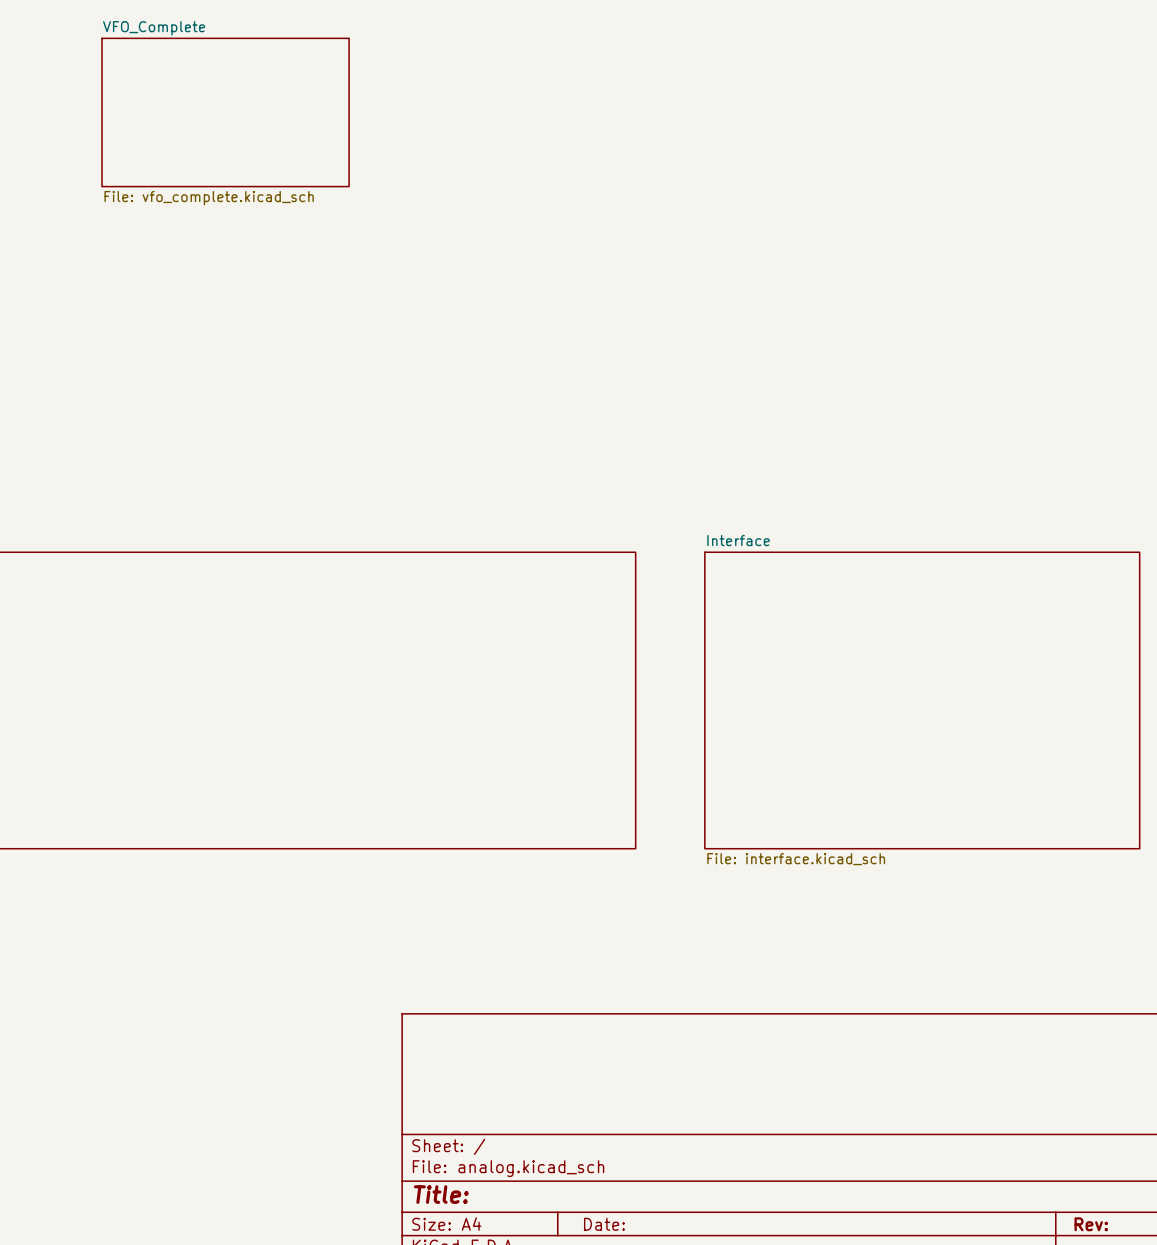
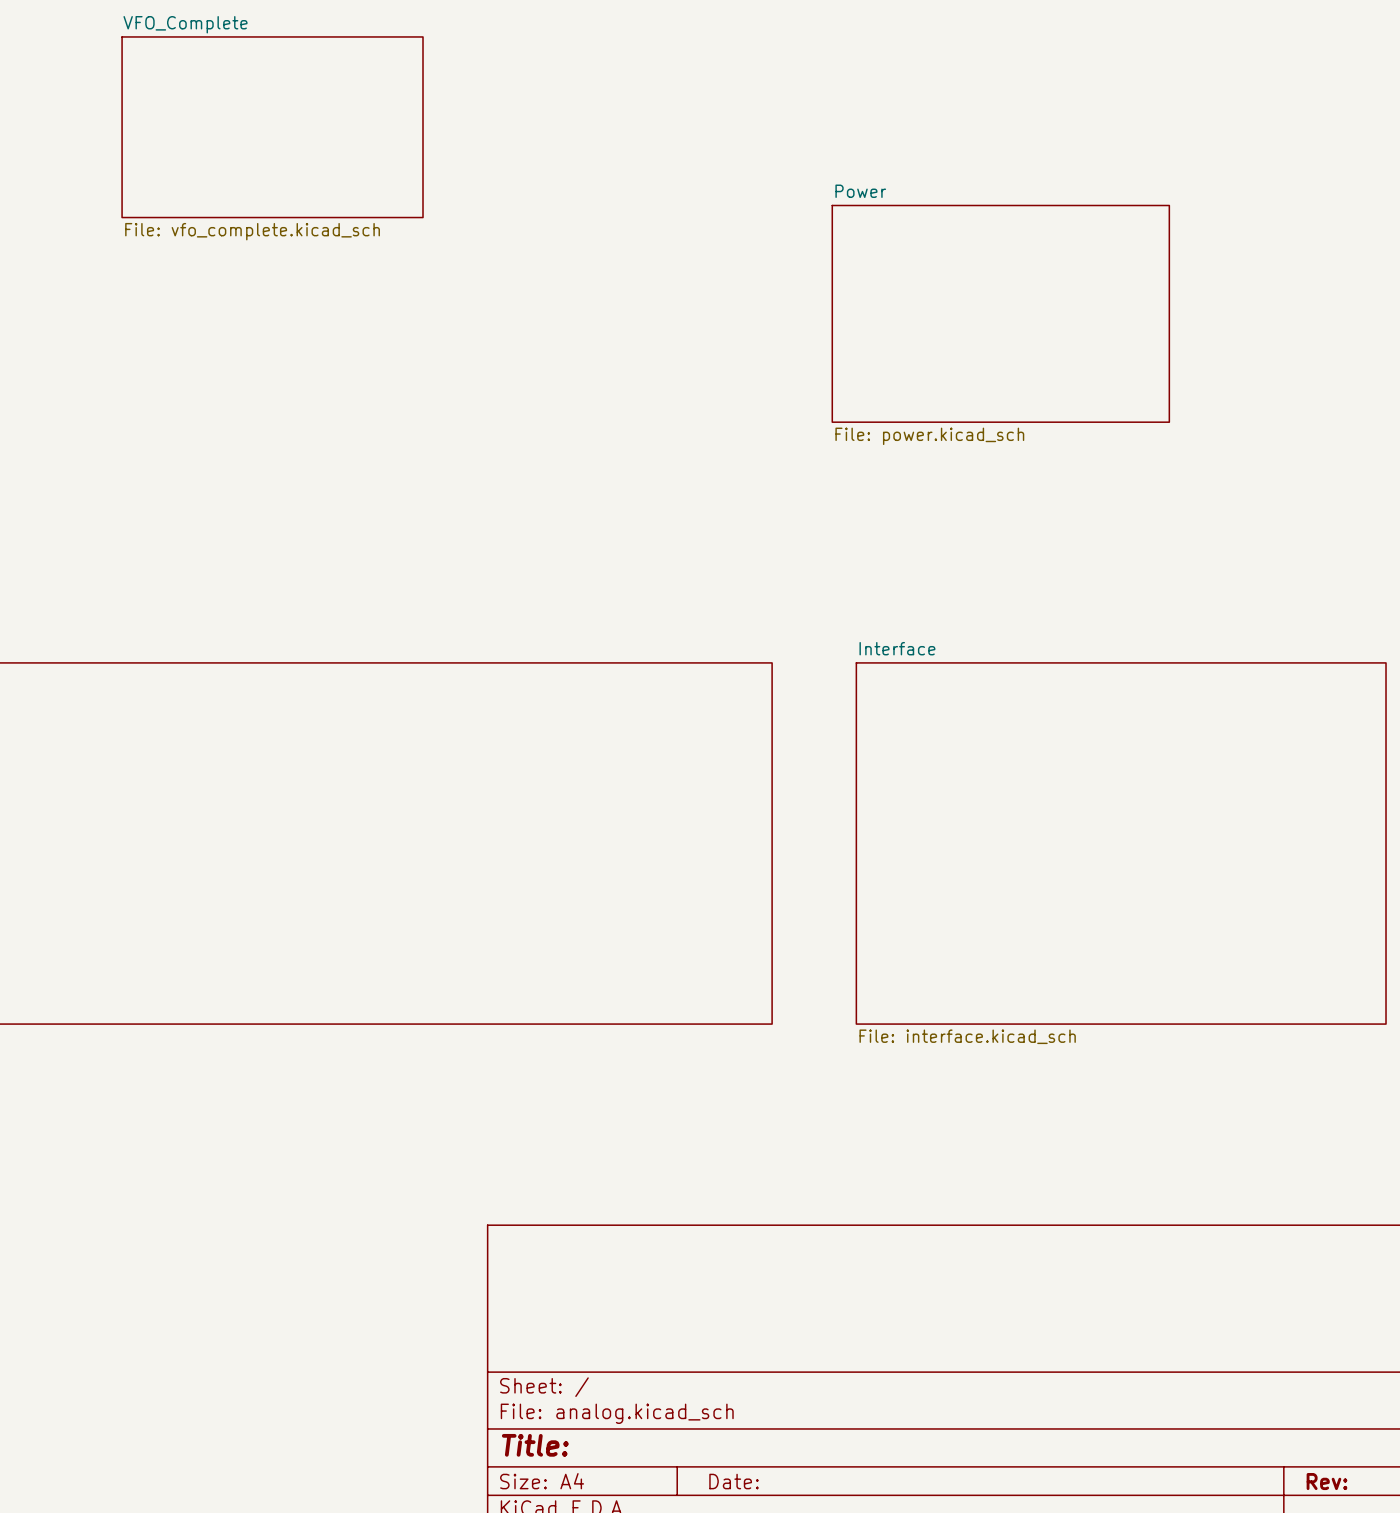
sheet Power: none -> File: power.kicad_sch (1000, 313)

